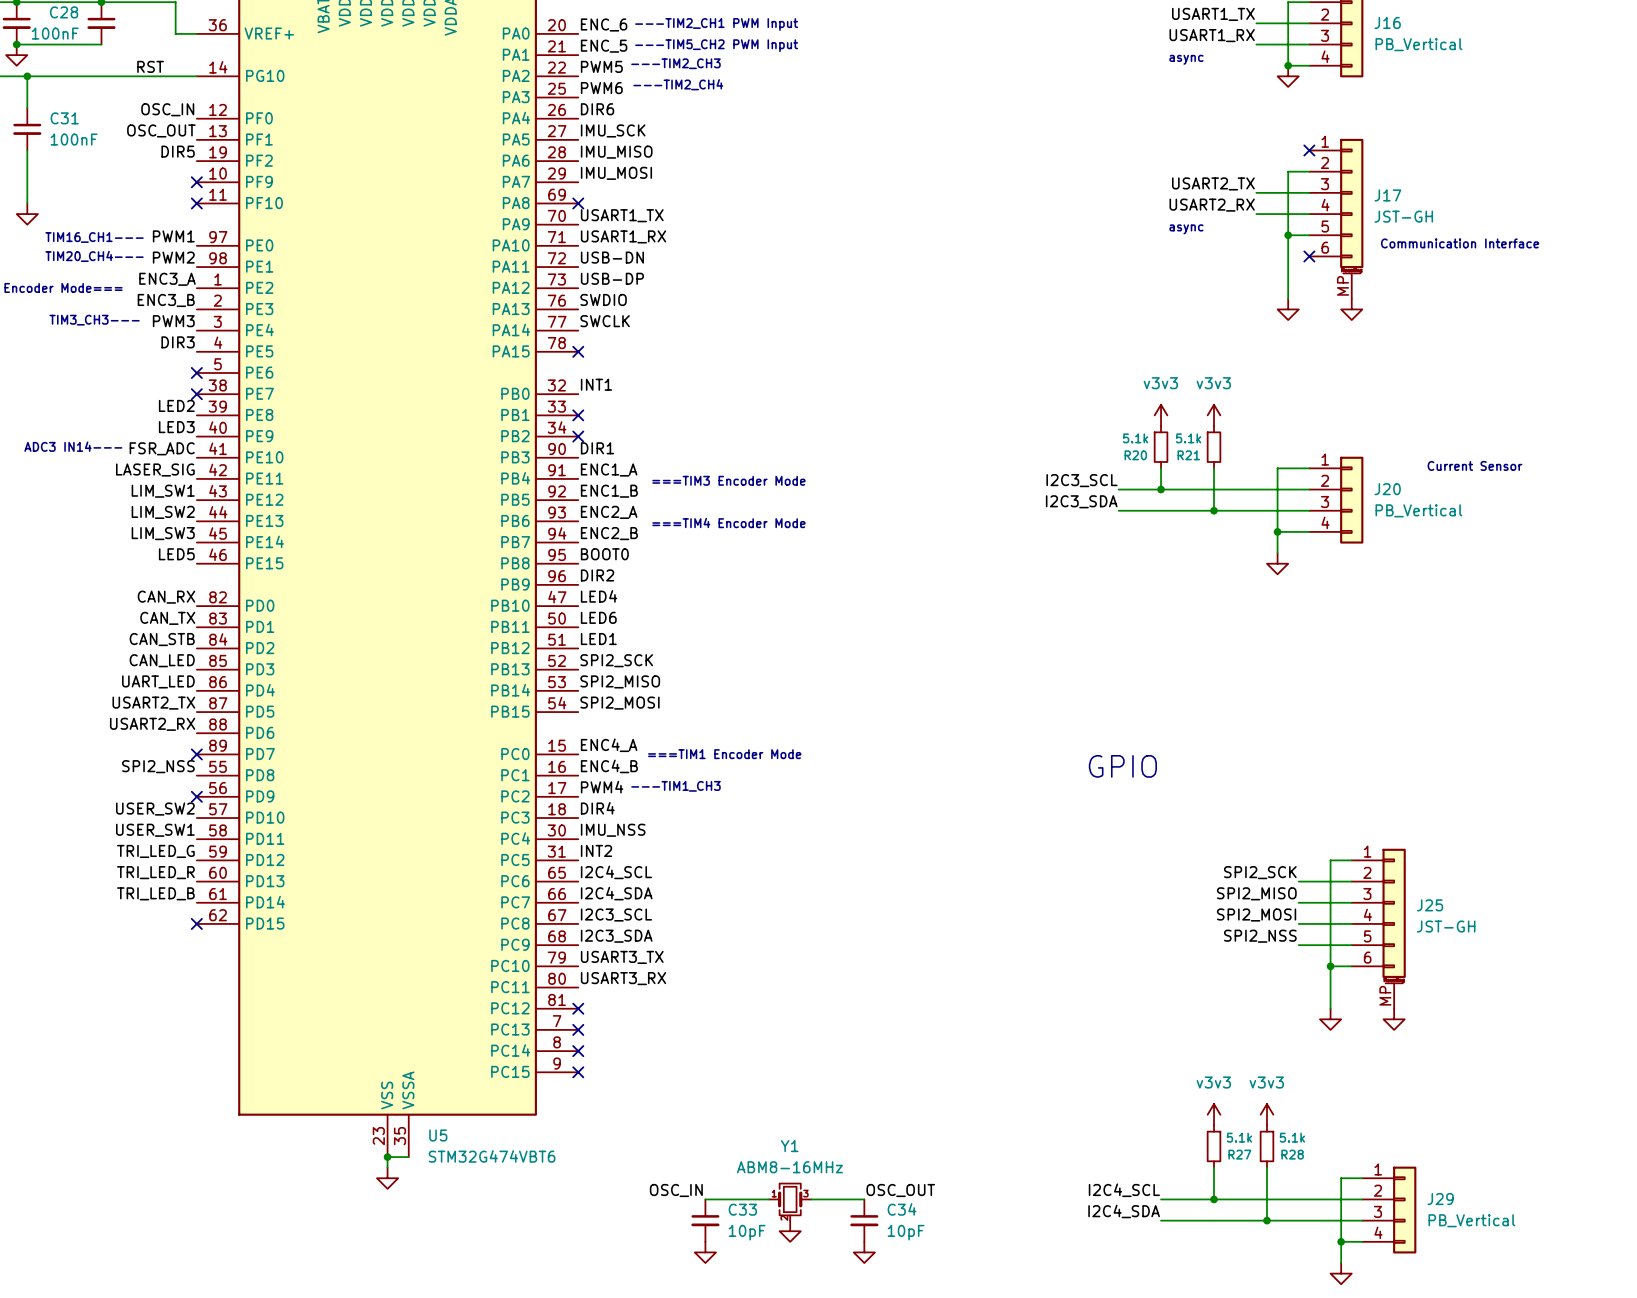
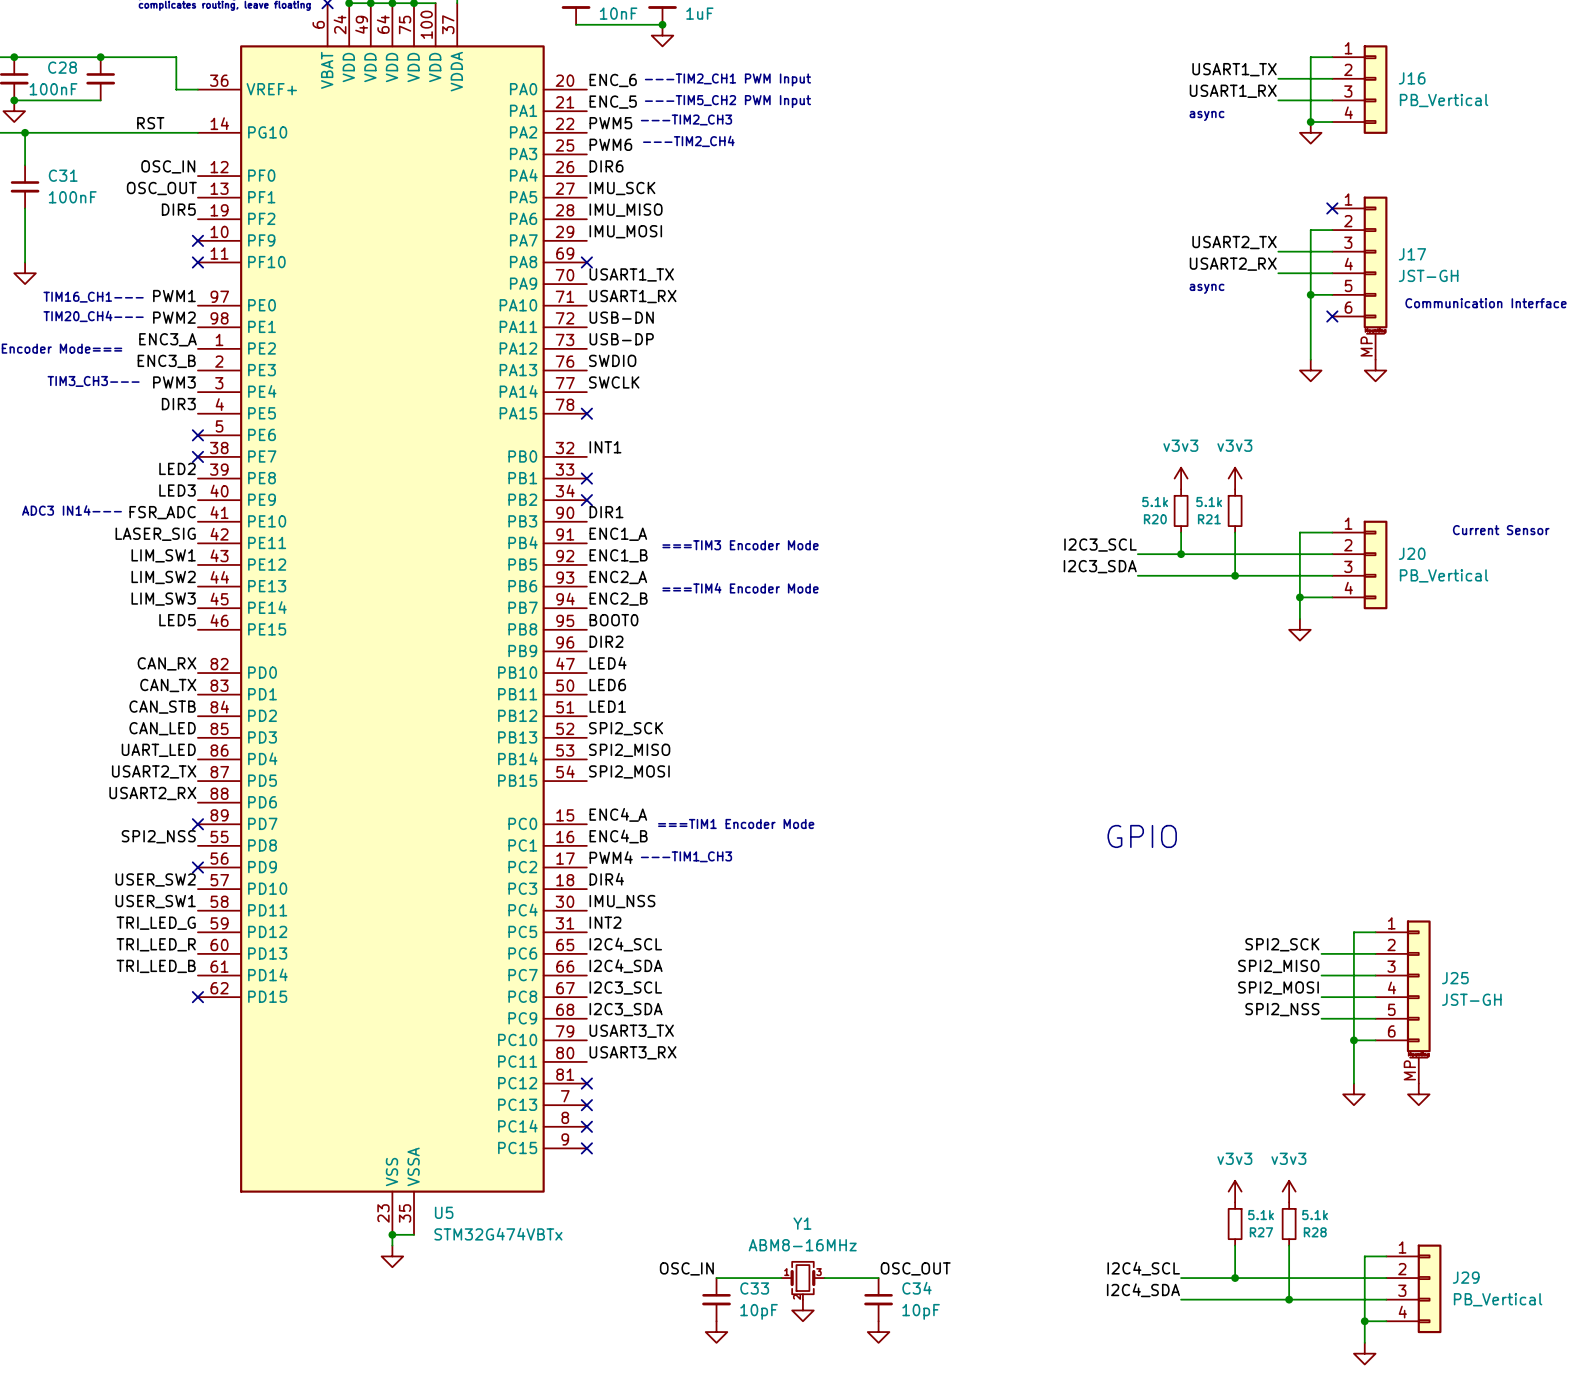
U5 value: STM32G474VBT6 (492, 1156) -> STM32G474VBTx (498, 1234)

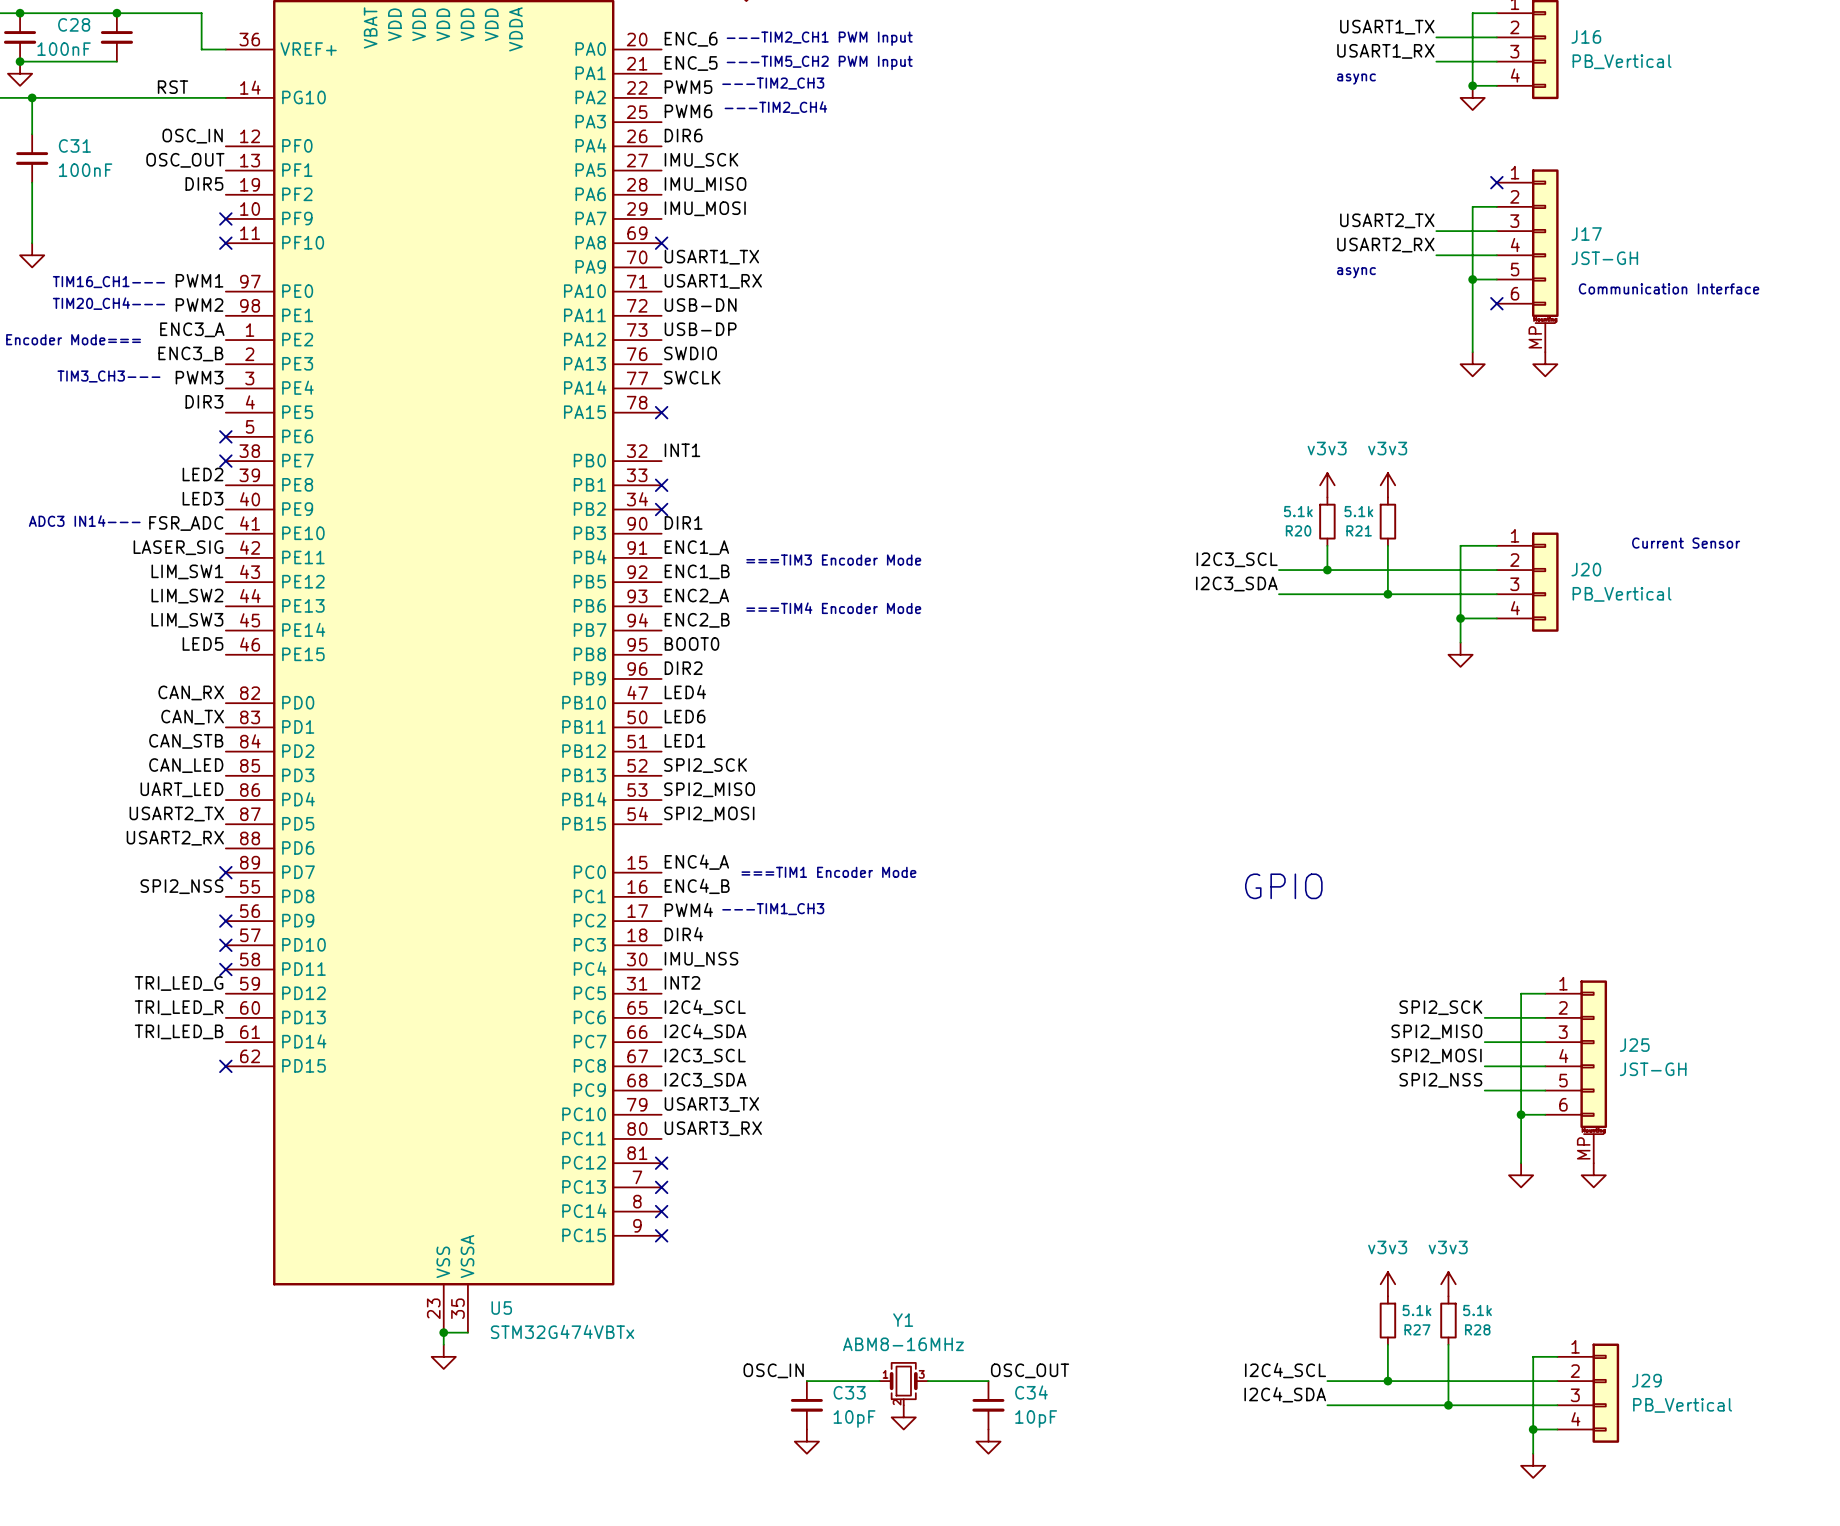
label: USER_SW2 (155, 879) -> none
no-connect mark: none -> (225, 945)
label: USER_SW1 (155, 901) -> none
no-connect mark: none -> (225, 969)

